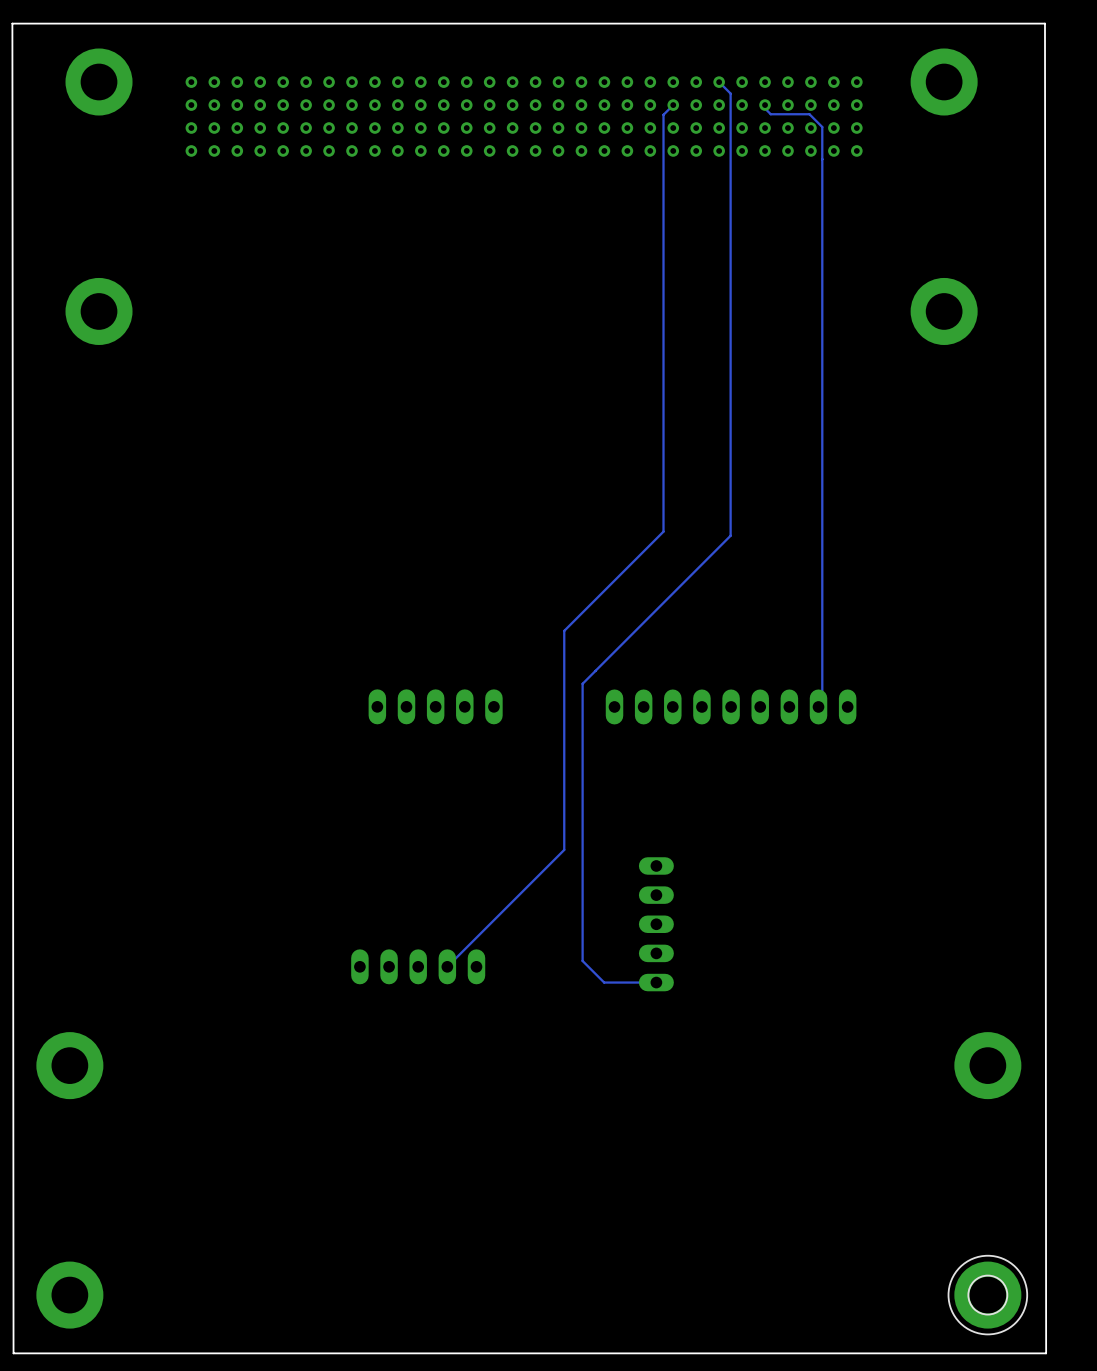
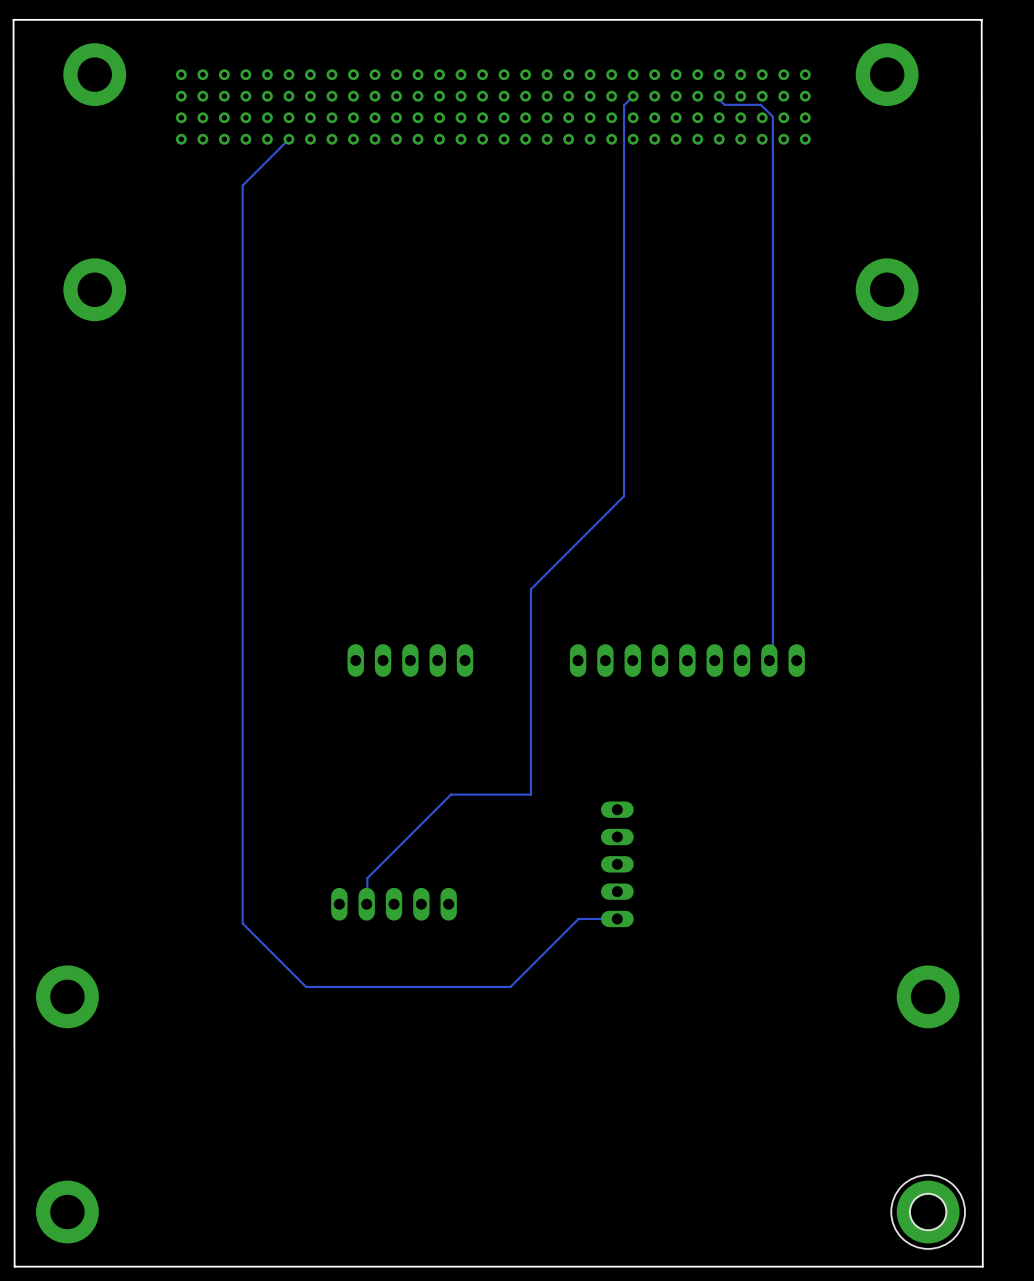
track: (719, 82) (730, 93) (730, 535) (582, 683) (582, 960) (604, 982) (614, 982) -> (288, 139) (242, 185) (242, 923) (306, 986) (510, 986) (578, 918)
track: (564, 849) (447, 966) -> (530, 794) (450, 794) (367, 878) (367, 904)

